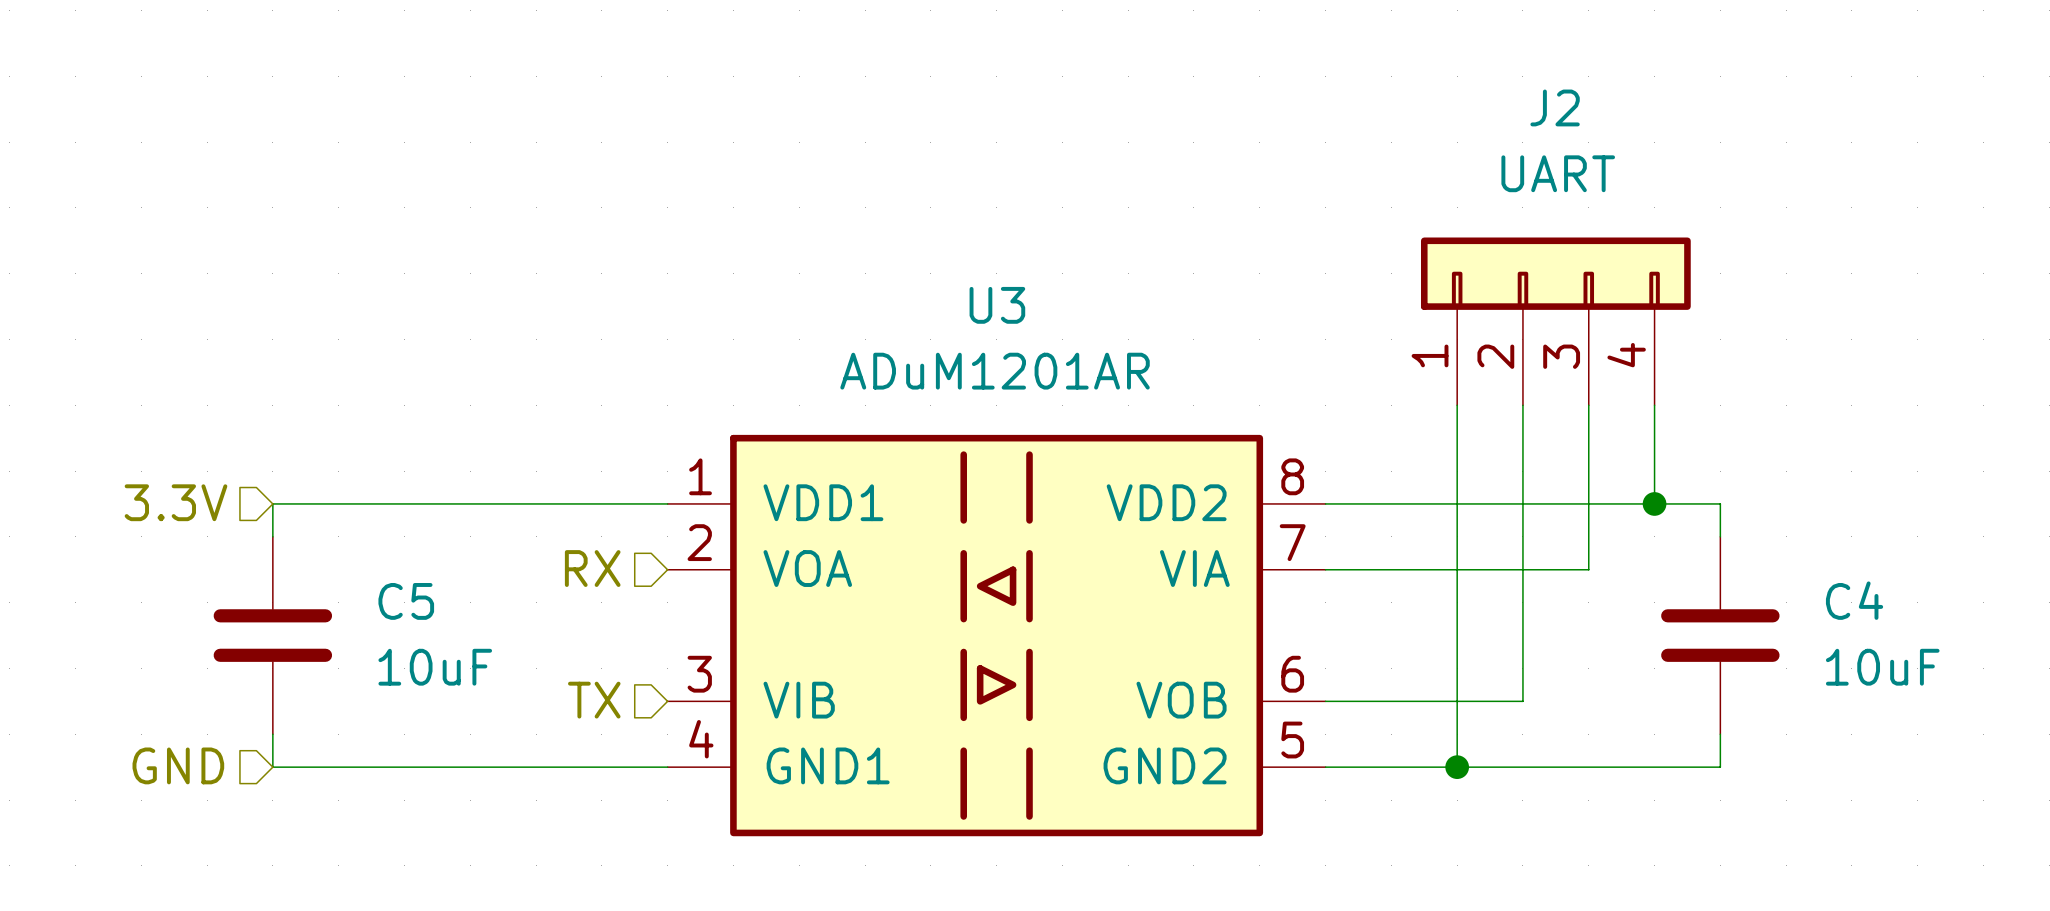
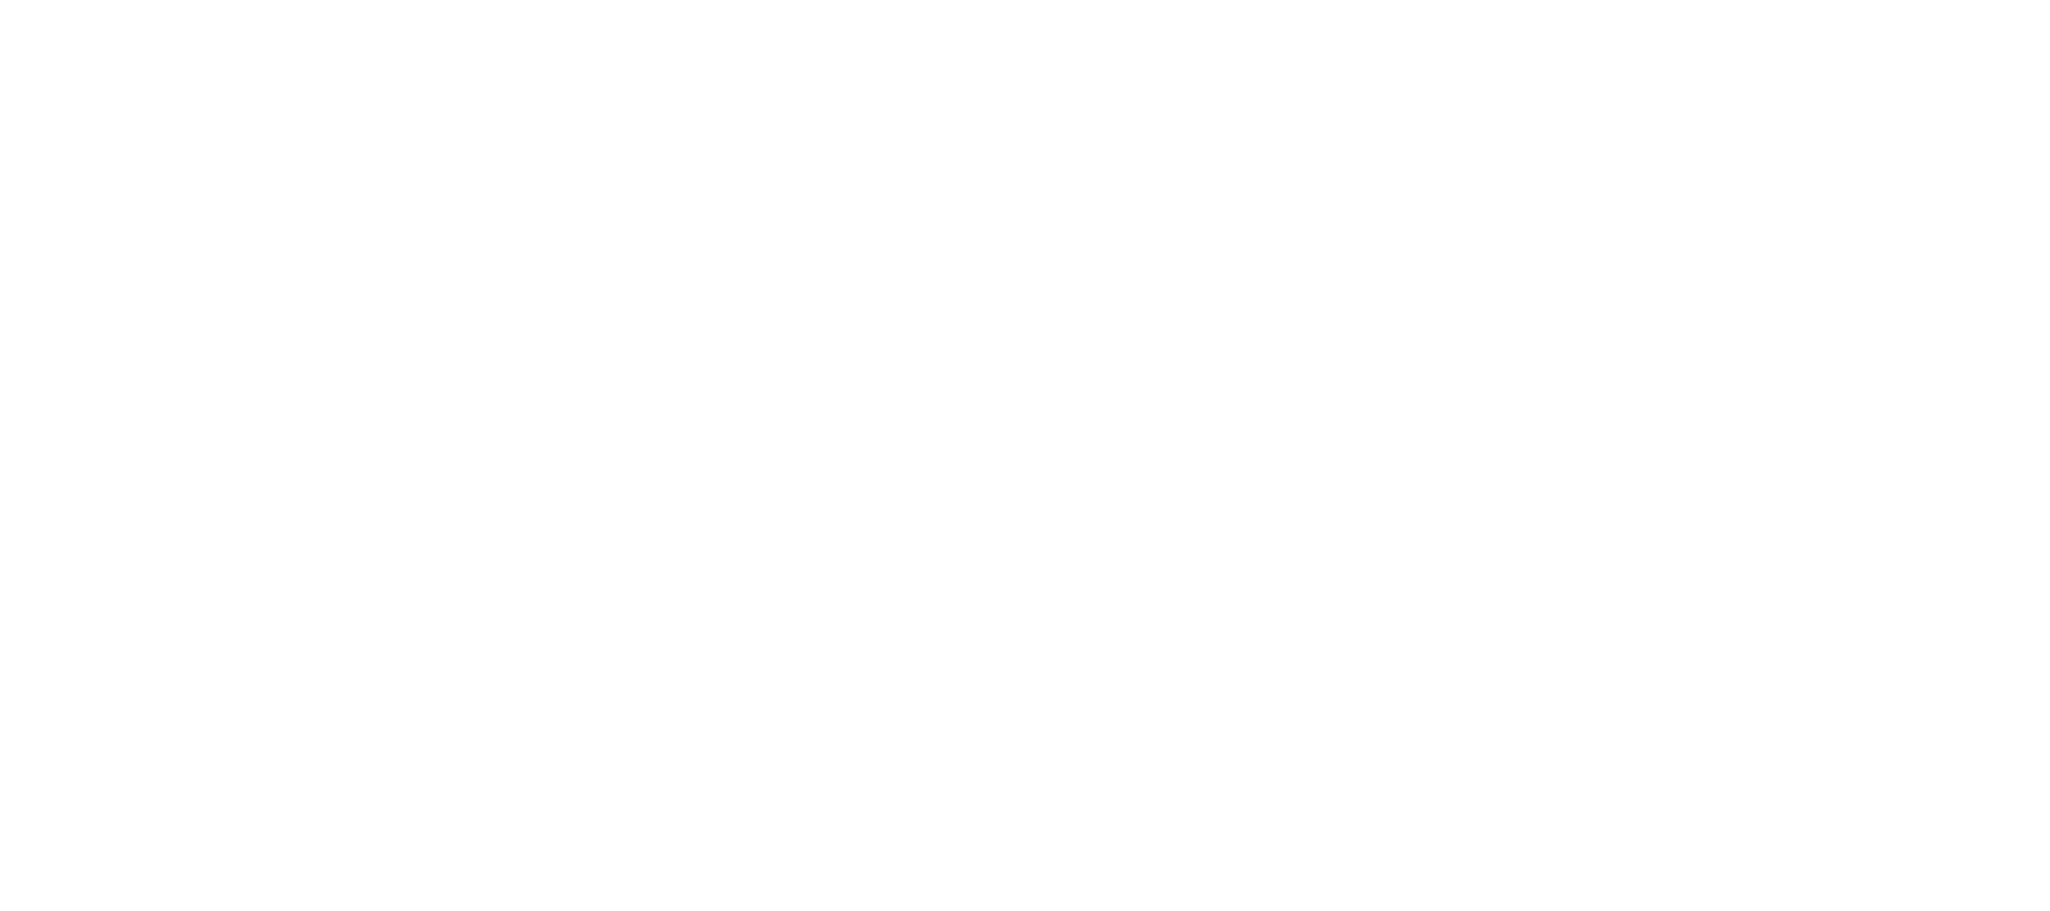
J2: UART (1555, 321) -> none
wire: (1457, 405) (1457, 767) -> none
wire: (1522, 405) (1522, 701) (1325, 701) -> none
wire: (1588, 405) (1588, 569) (1325, 569) -> none
wire: (1654, 405) (1654, 503) -> none
hierarchical label: 3.3V (176, 502) -> none
wire: (667, 503) (272, 503) (272, 536) -> none
wire: (1325, 503) (1720, 503) (1720, 536) -> none
junction: (1654, 503) -> none
hierarchical label: RX (592, 568) -> none
C5: 10uF (272, 635) -> none
U3: ADuM1201AR (996, 635) -> none
C4: 10uF (1720, 635) -> none
hierarchical label: TX (594, 700) -> none
wire: (272, 734) (272, 767) (667, 767) -> none
wire: (1720, 734) (1720, 767) (1325, 767) -> none
hierarchical label: GND (178, 765) -> none
junction: (1457, 767) -> none

